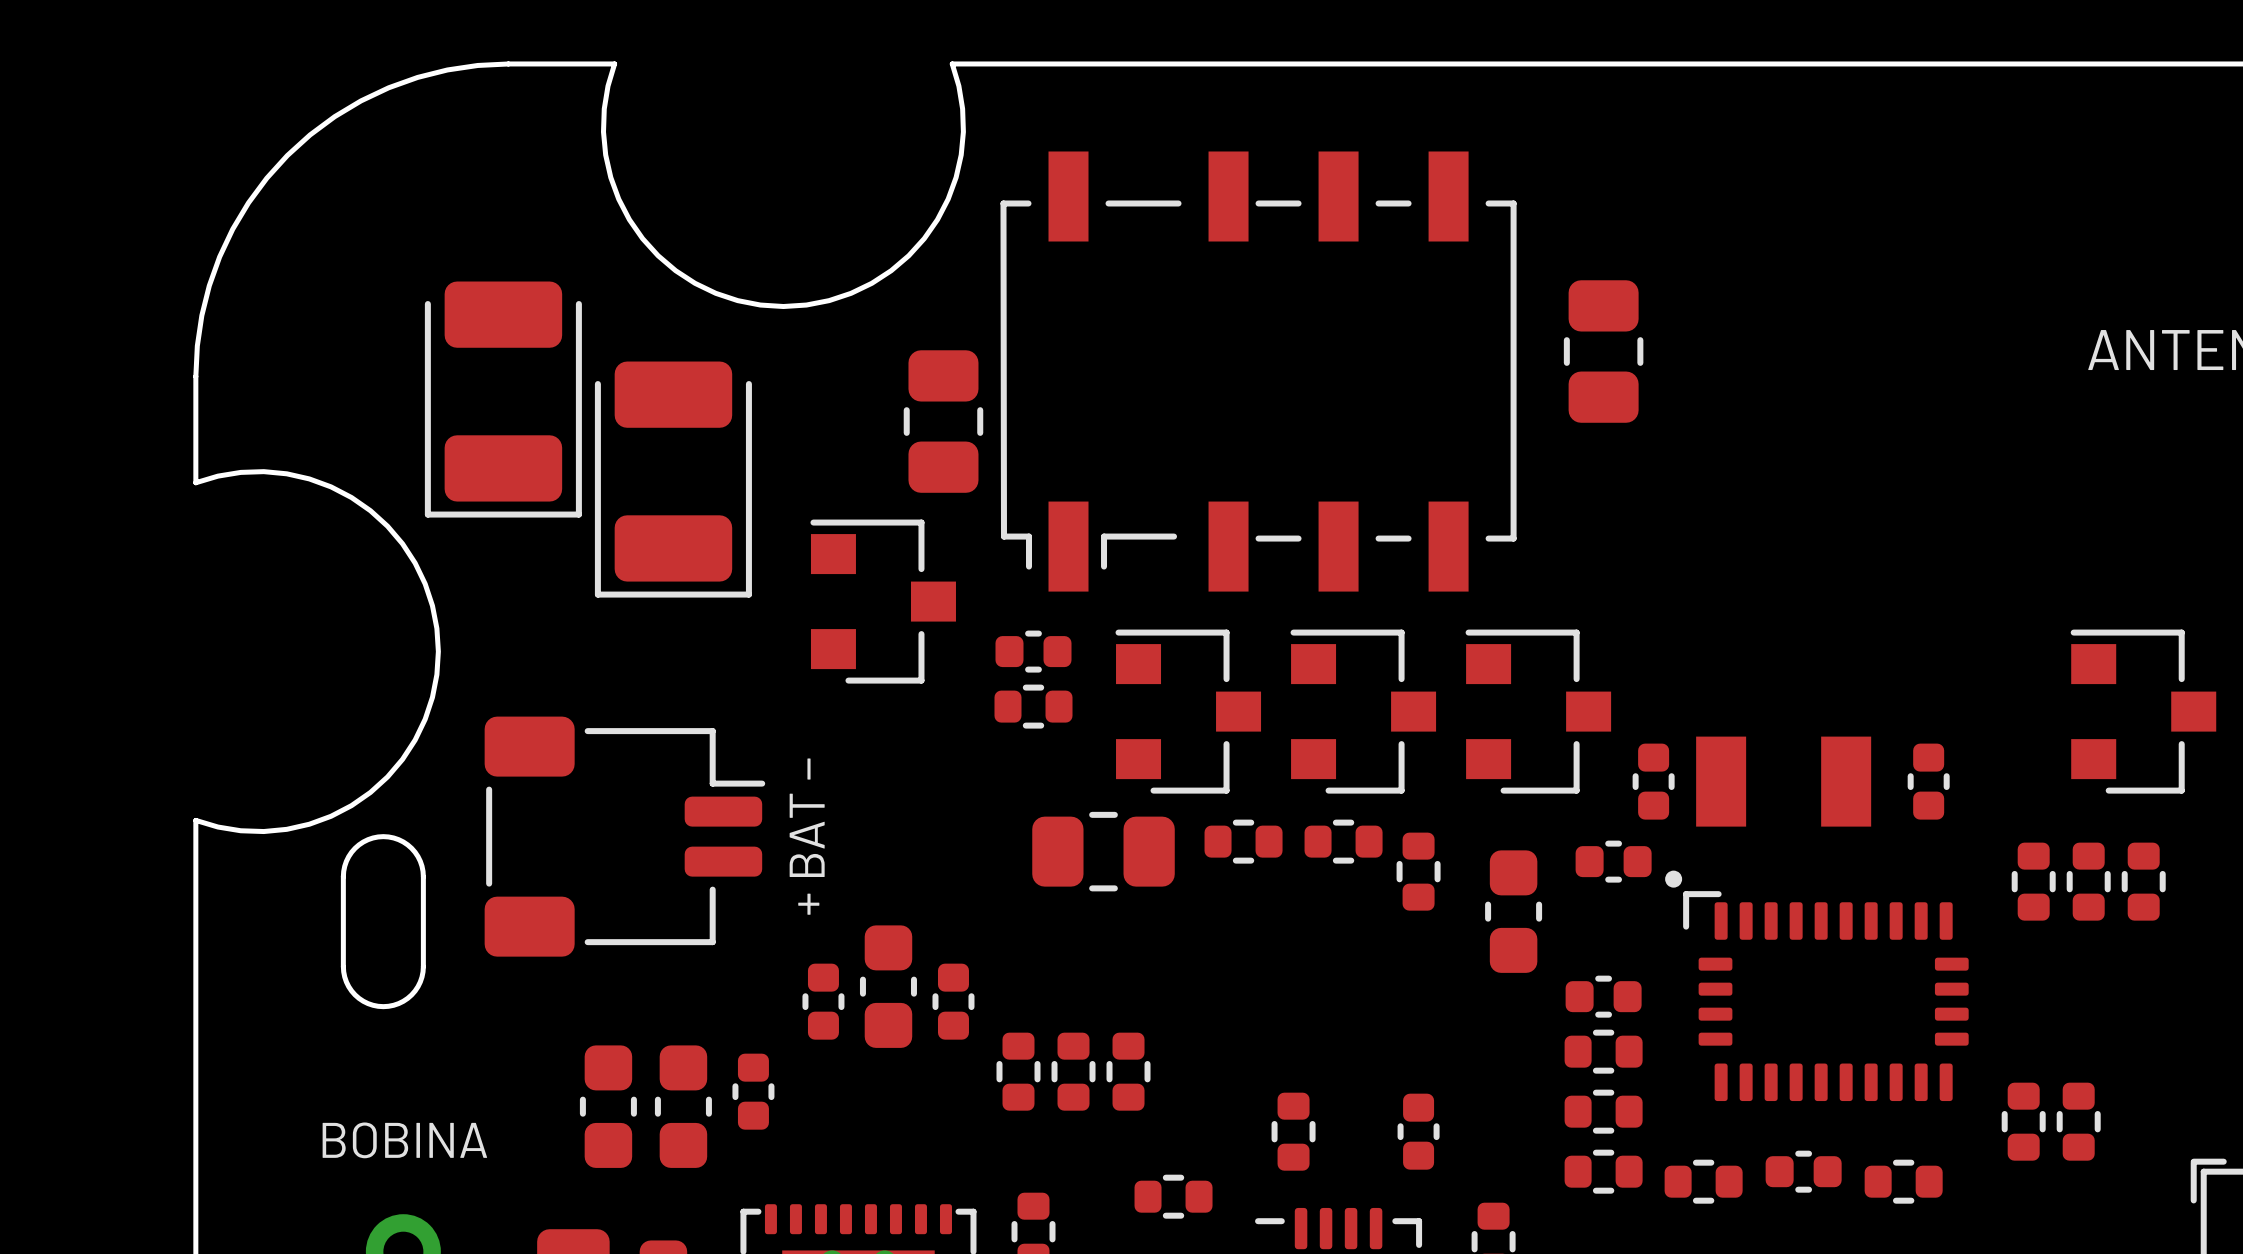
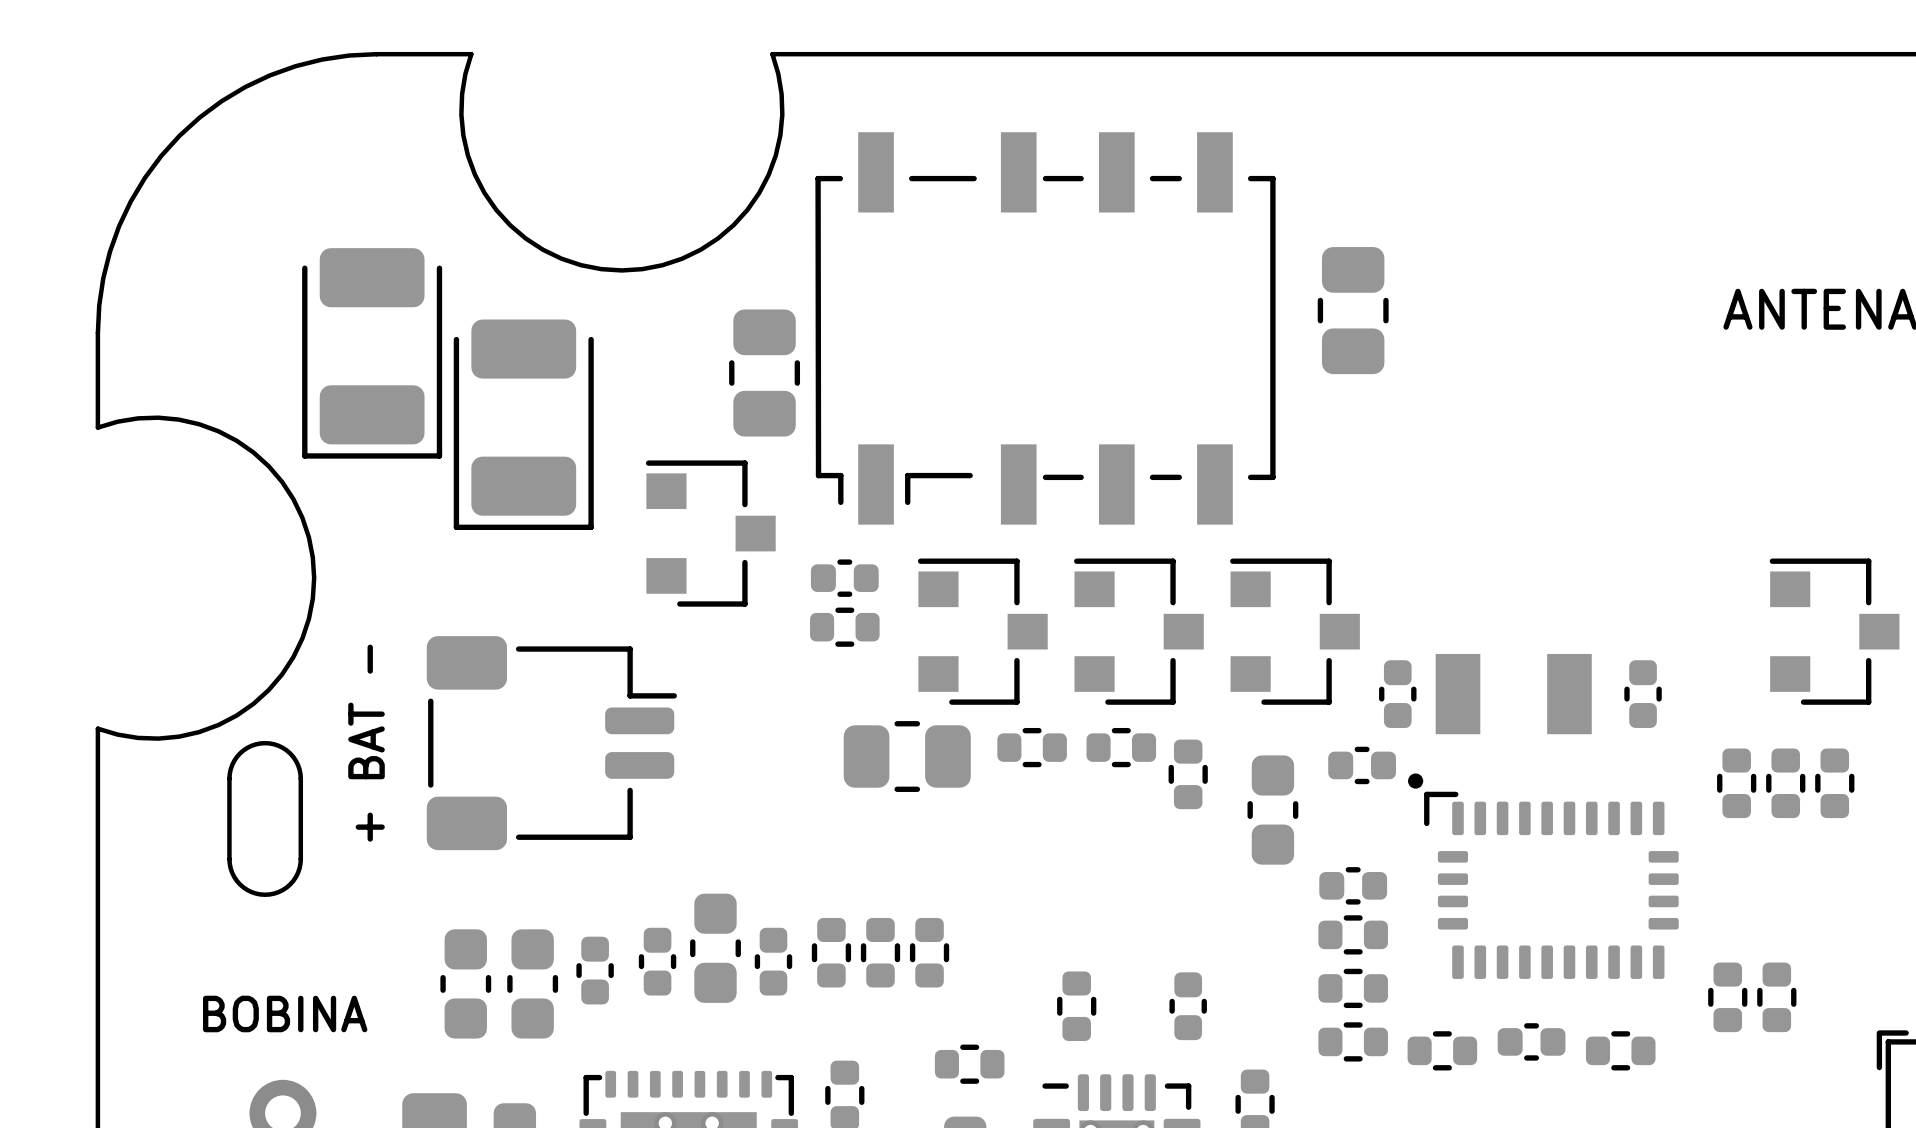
part position: (624, 836) -> (551, 743)
text position: + BAT − (807, 836) -> + BAT − (366, 743)
part position: (888, 986) -> (715, 948)
part: (823, 1001) -> none
part: (953, 1001) -> none
part: none -> (657, 961)
part: none -> (773, 961)

